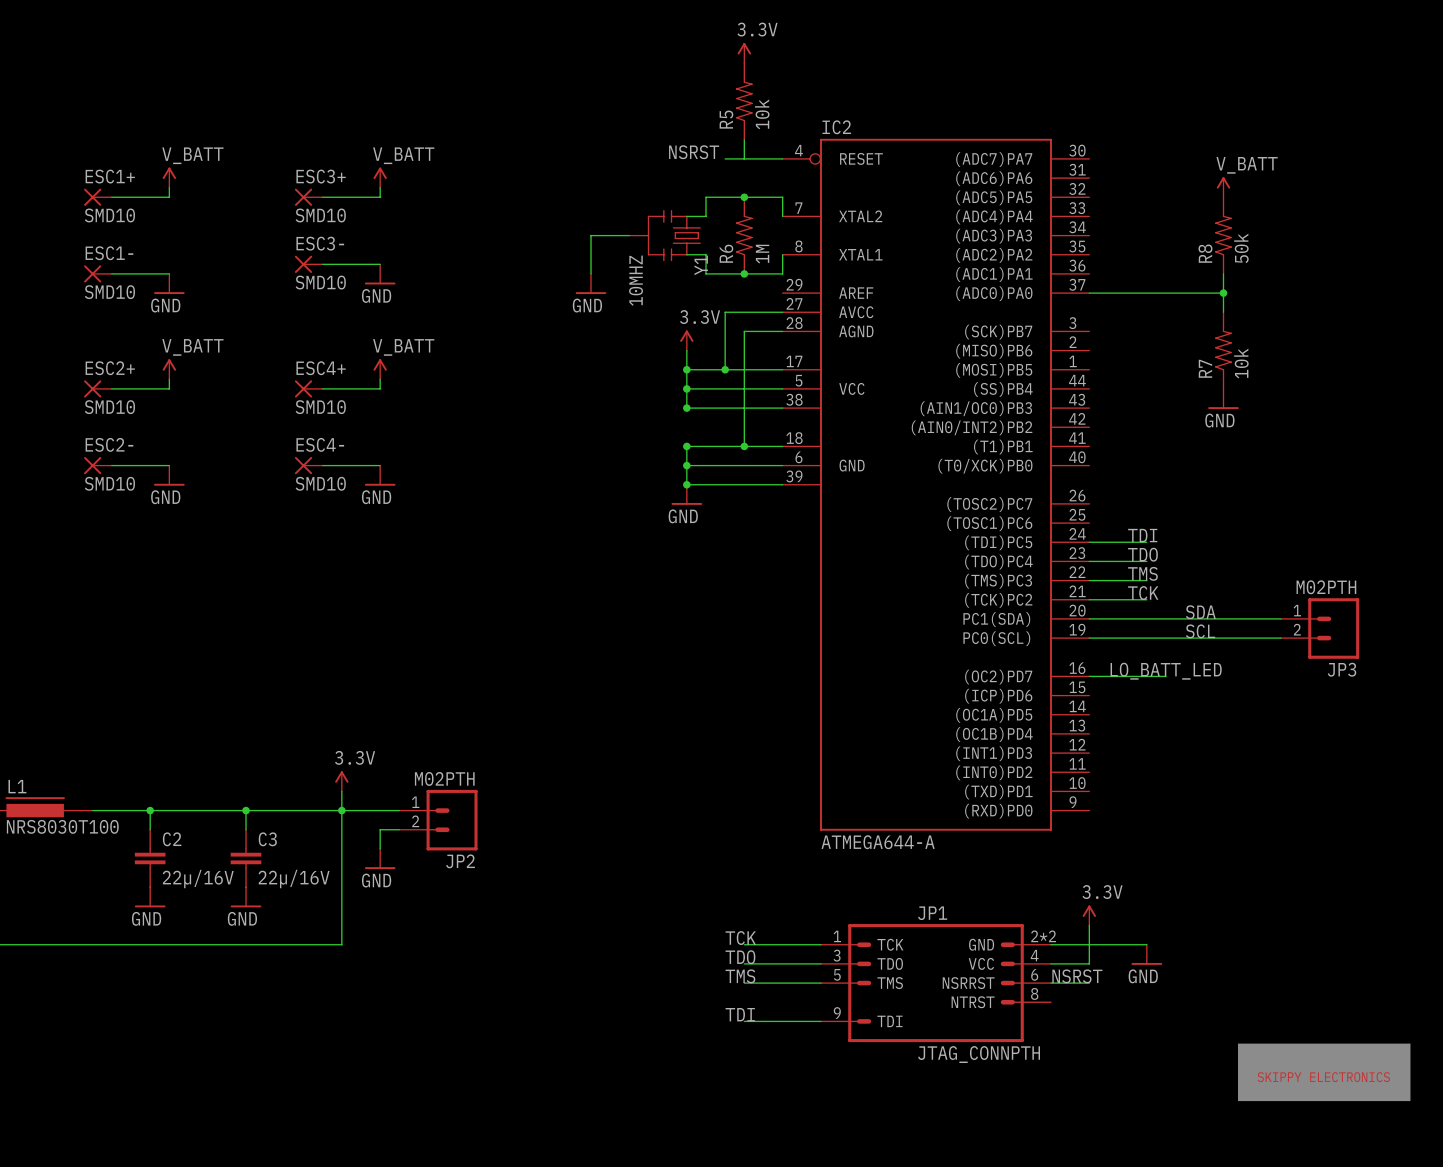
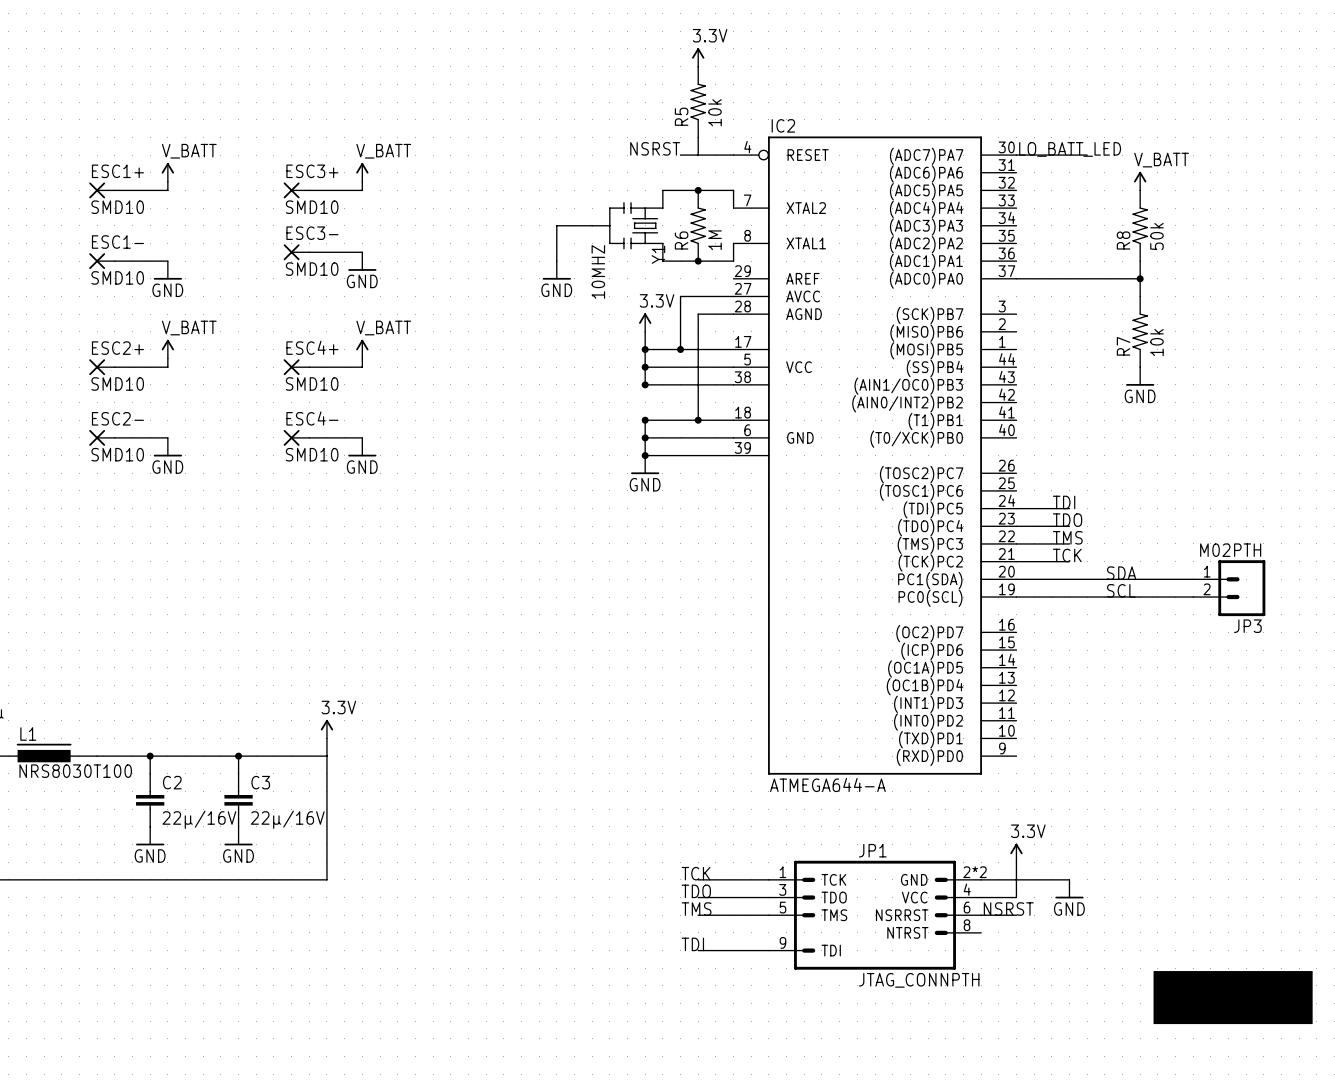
label: none -> LO_BATT_LED (1070, 149)
wire: none -> (1016, 155) (1087, 155)
label: LO_BATT_LED (1166, 671) -> none
wire: (1089, 676) (1165, 676) -> none
wire: (341, 810) (399, 810) -> none
junction: (341, 810) -> none
JP2: M02PTH (438, 820) -> none
wire: (399, 829) (380, 829) (380, 848) -> none
power symbol: GND (380, 858) -> none

